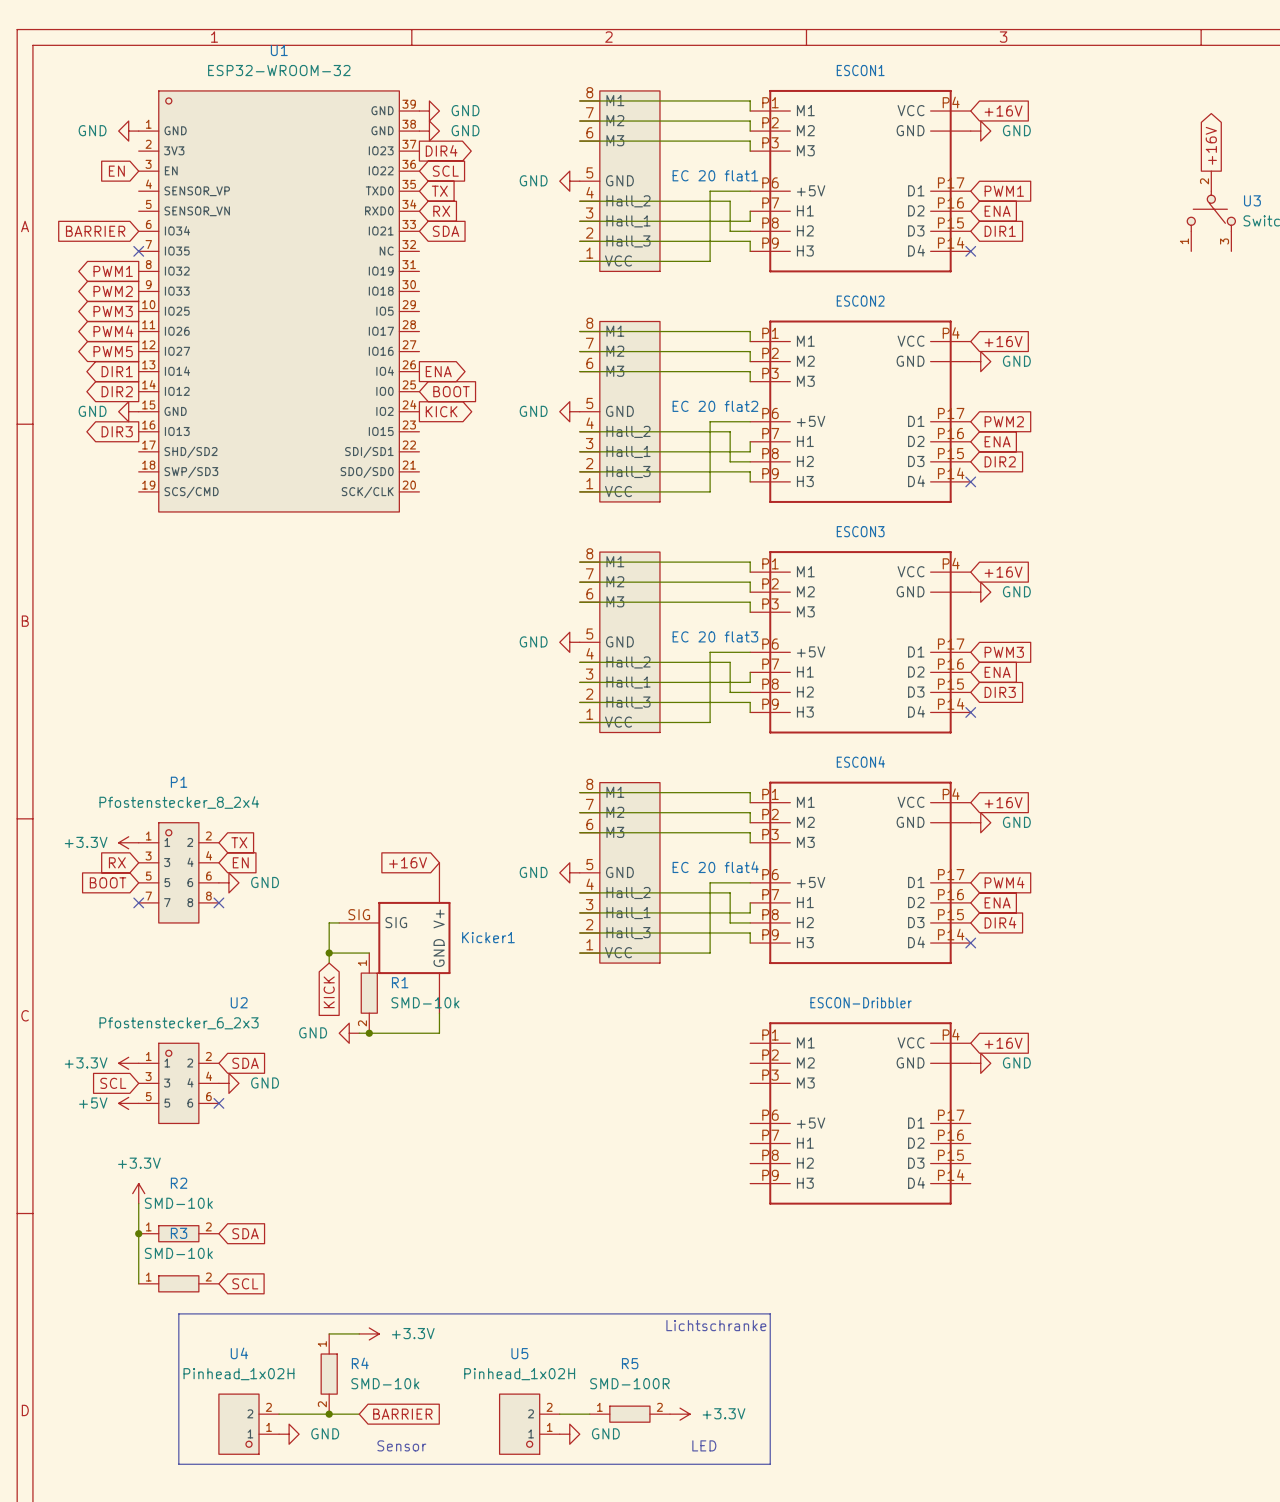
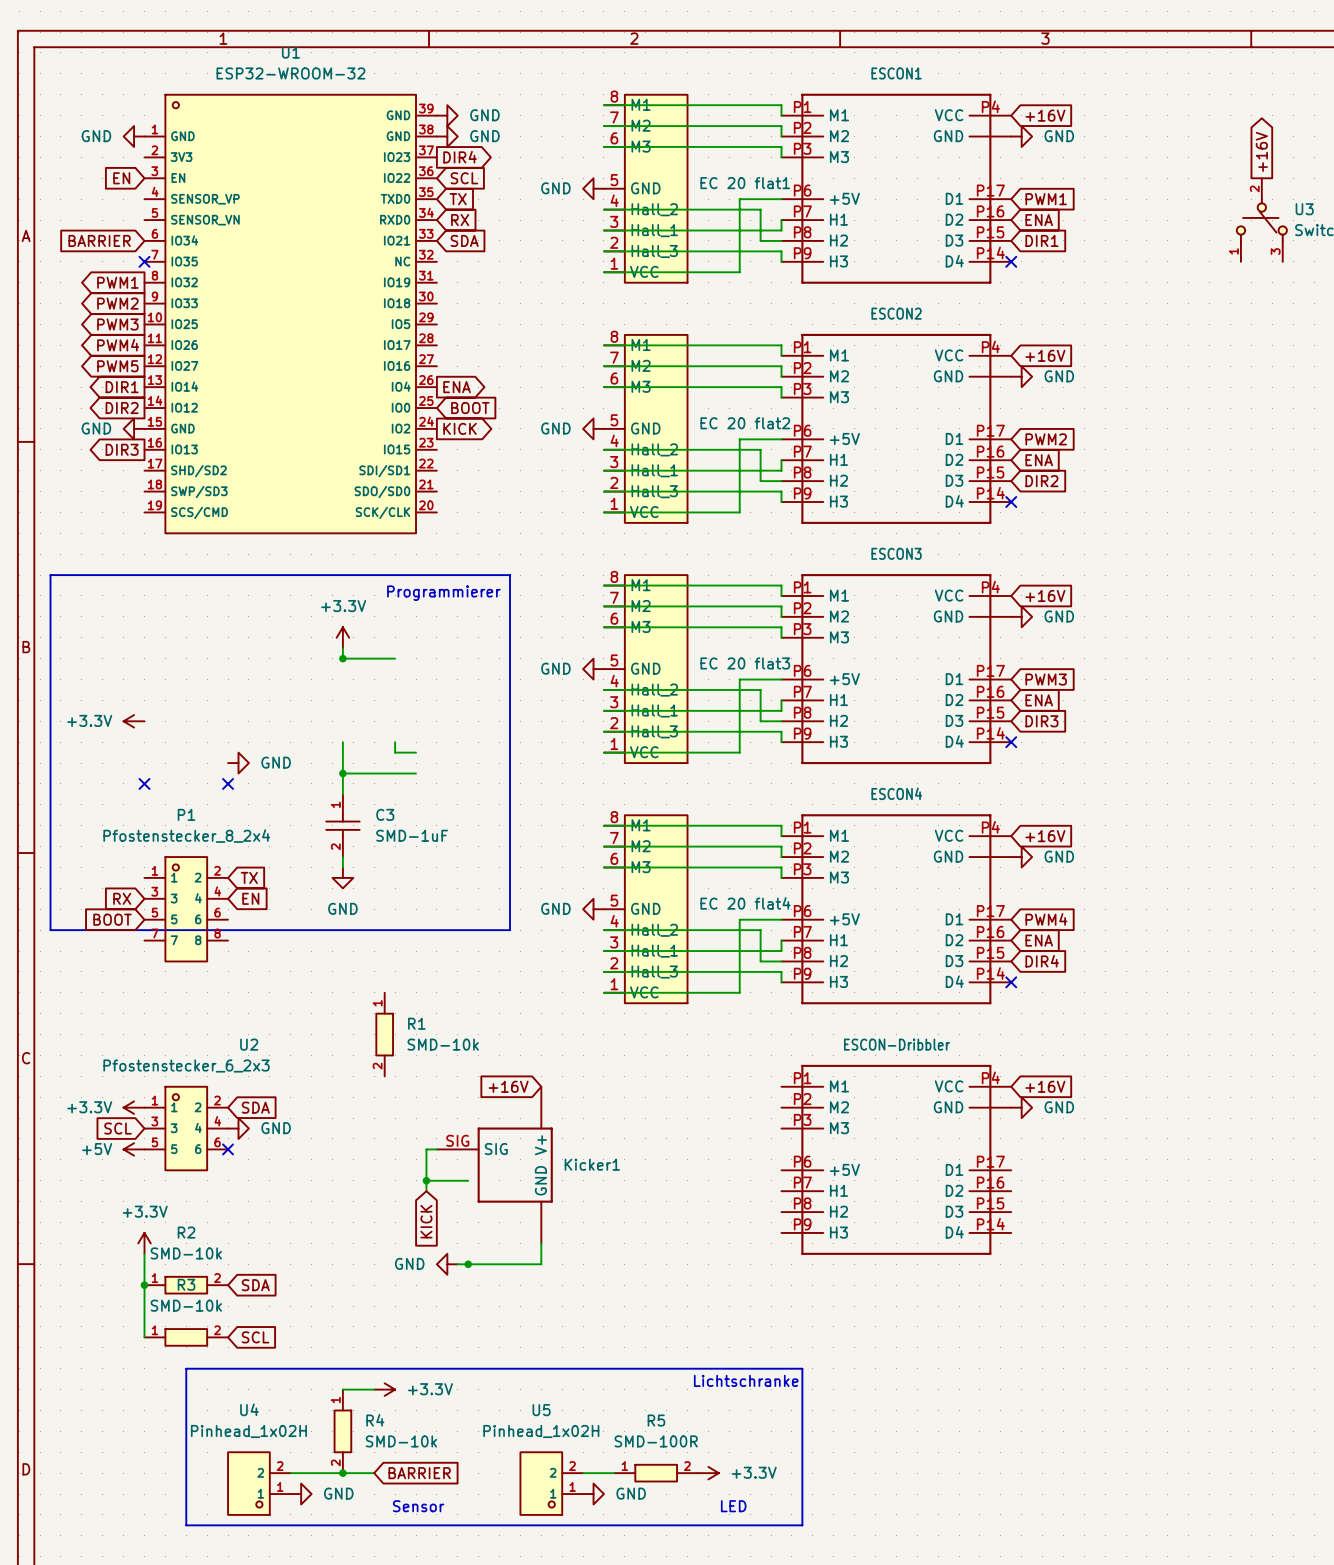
line: none -> (50, 575) (509, 575) (509, 930) (50, 930) (50, 575)
text: none -> Programmierer (443, 593)
power symbol: none -> +3.3V (342, 637)
wire: none -> (342, 648) (342, 658) (395, 658)
junction: none -> (342, 658)
wire: none -> (342, 742) (342, 794)
wire: none -> (395, 742) (395, 752) (416, 752)
power symbol: none -> GND (238, 763)
wire: none -> (342, 773) (416, 773)
junction: none -> (342, 773)
no-connect mark: none -> (144, 783)
no-connect mark: none -> (228, 783)
C3: none -> SMD-1uF (342, 825)
wire: none -> (342, 857) (342, 867)
power symbol position: +3.3V (128, 842) -> +3.3V (134, 721)
power symbol: none -> GND (342, 877)
global label: +16V (408, 862) -> none
power symbol: GND (228, 882) -> none
no-connect mark: (138, 902) -> none
no-connect mark: (218, 902) -> none
wire: (339, 922) (329, 922) (329, 963) -> none
Kicker1 position: (394, 938) -> (494, 1165)
wire: (329, 953) (369, 953) -> none
junction: (329, 953) -> none
global label: KICK (329, 992) -> none
wire: (439, 1013) (439, 1033) (359, 1033) -> none
power symbol: GND (349, 1033) -> none
junction: (369, 1033) -> none
global label: none -> +16V (508, 1086)
wire: none -> (436, 1149) (426, 1149) (426, 1191)
wire: none -> (426, 1180) (468, 1180)
junction: none -> (426, 1180)
global label: none -> KICK (426, 1221)
wire: none -> (541, 1243) (541, 1264) (457, 1264)
power symbol: none -> GND (447, 1264)
junction: none -> (468, 1264)

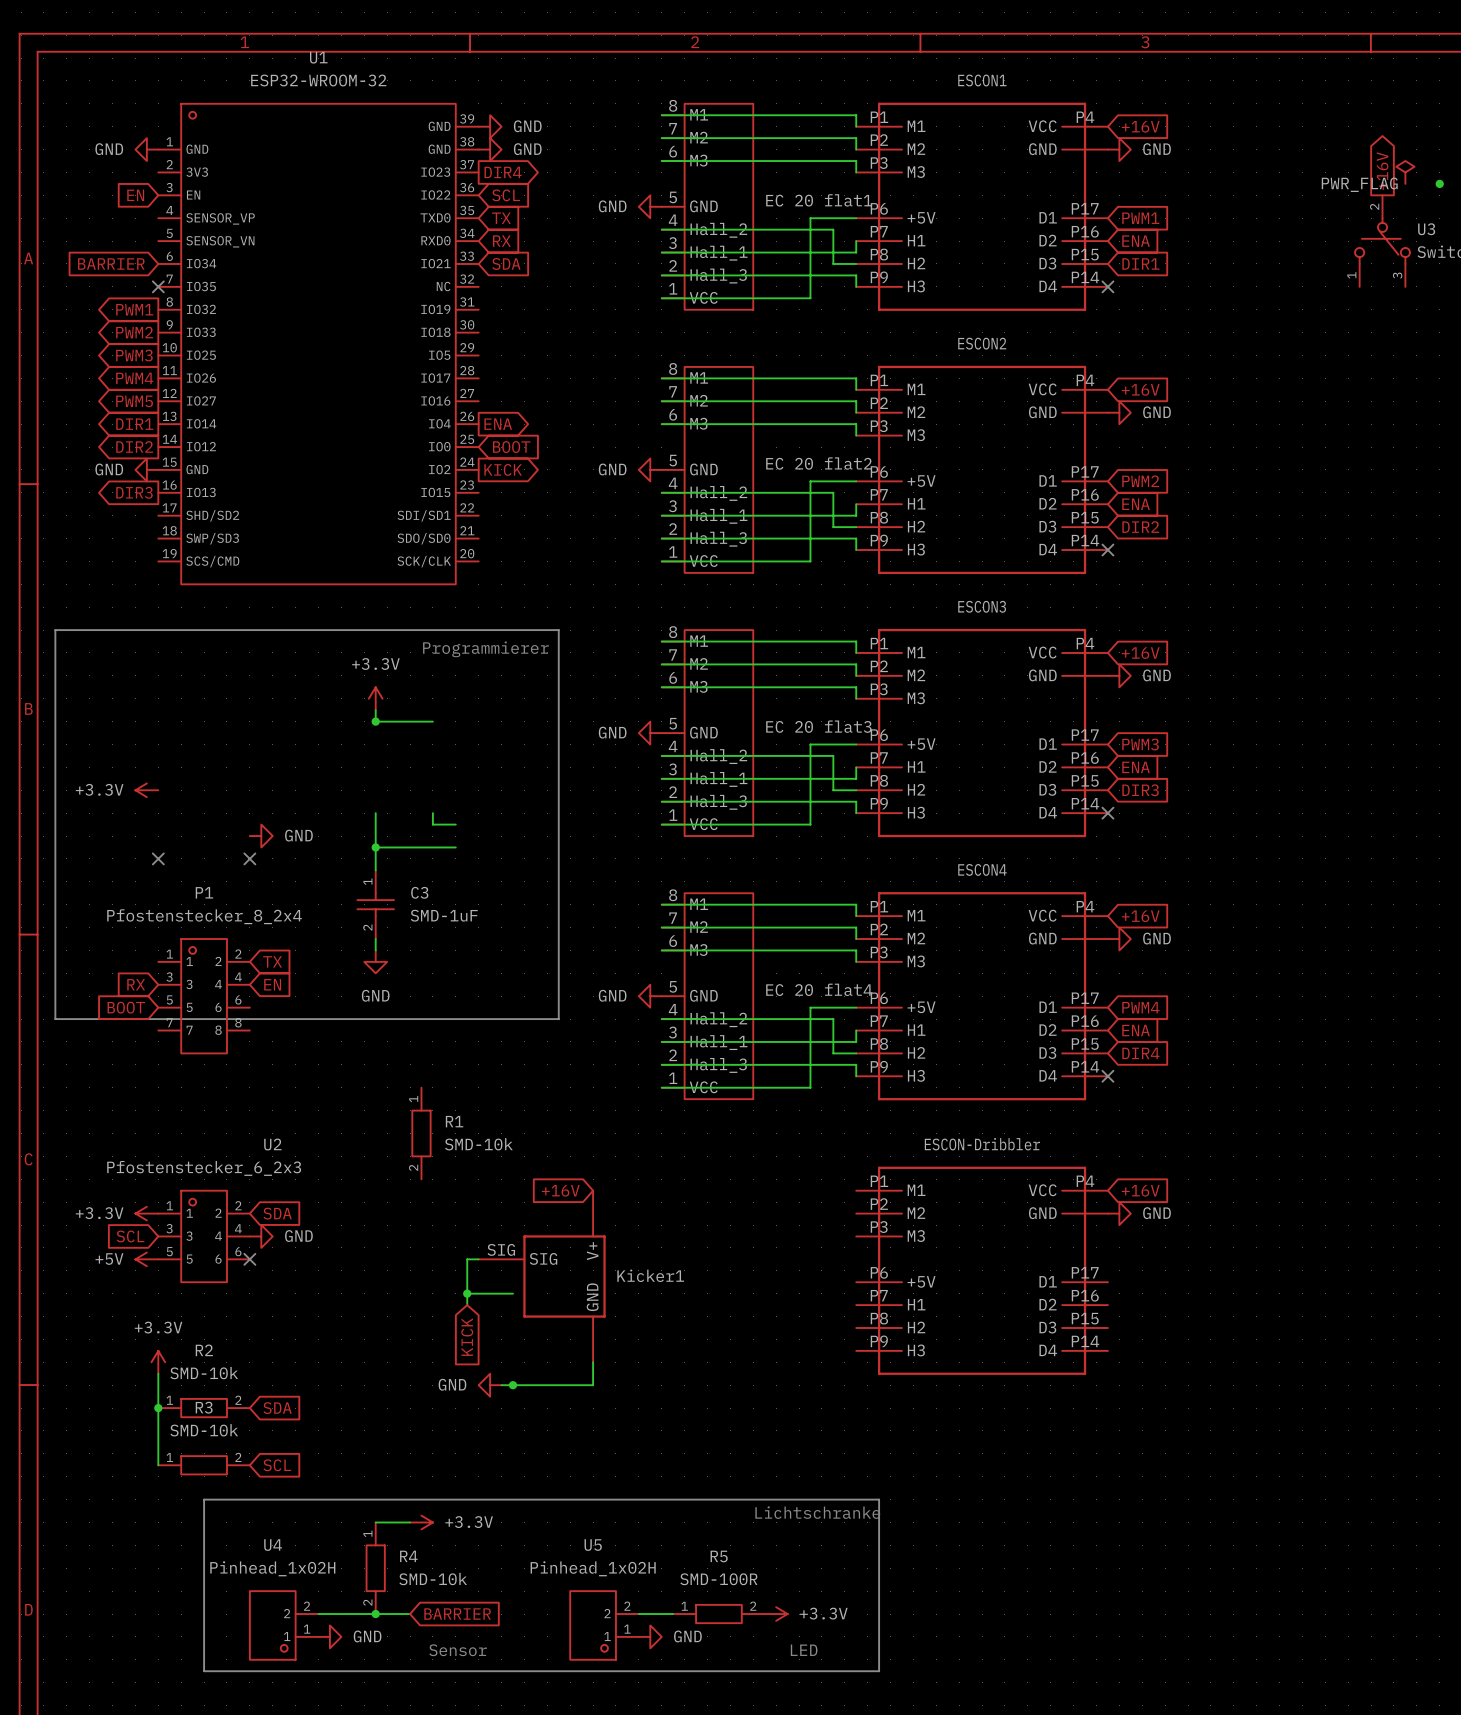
power symbol: none -> PWR_FLAG (1405, 172)
junction: none -> (1439, 183)

